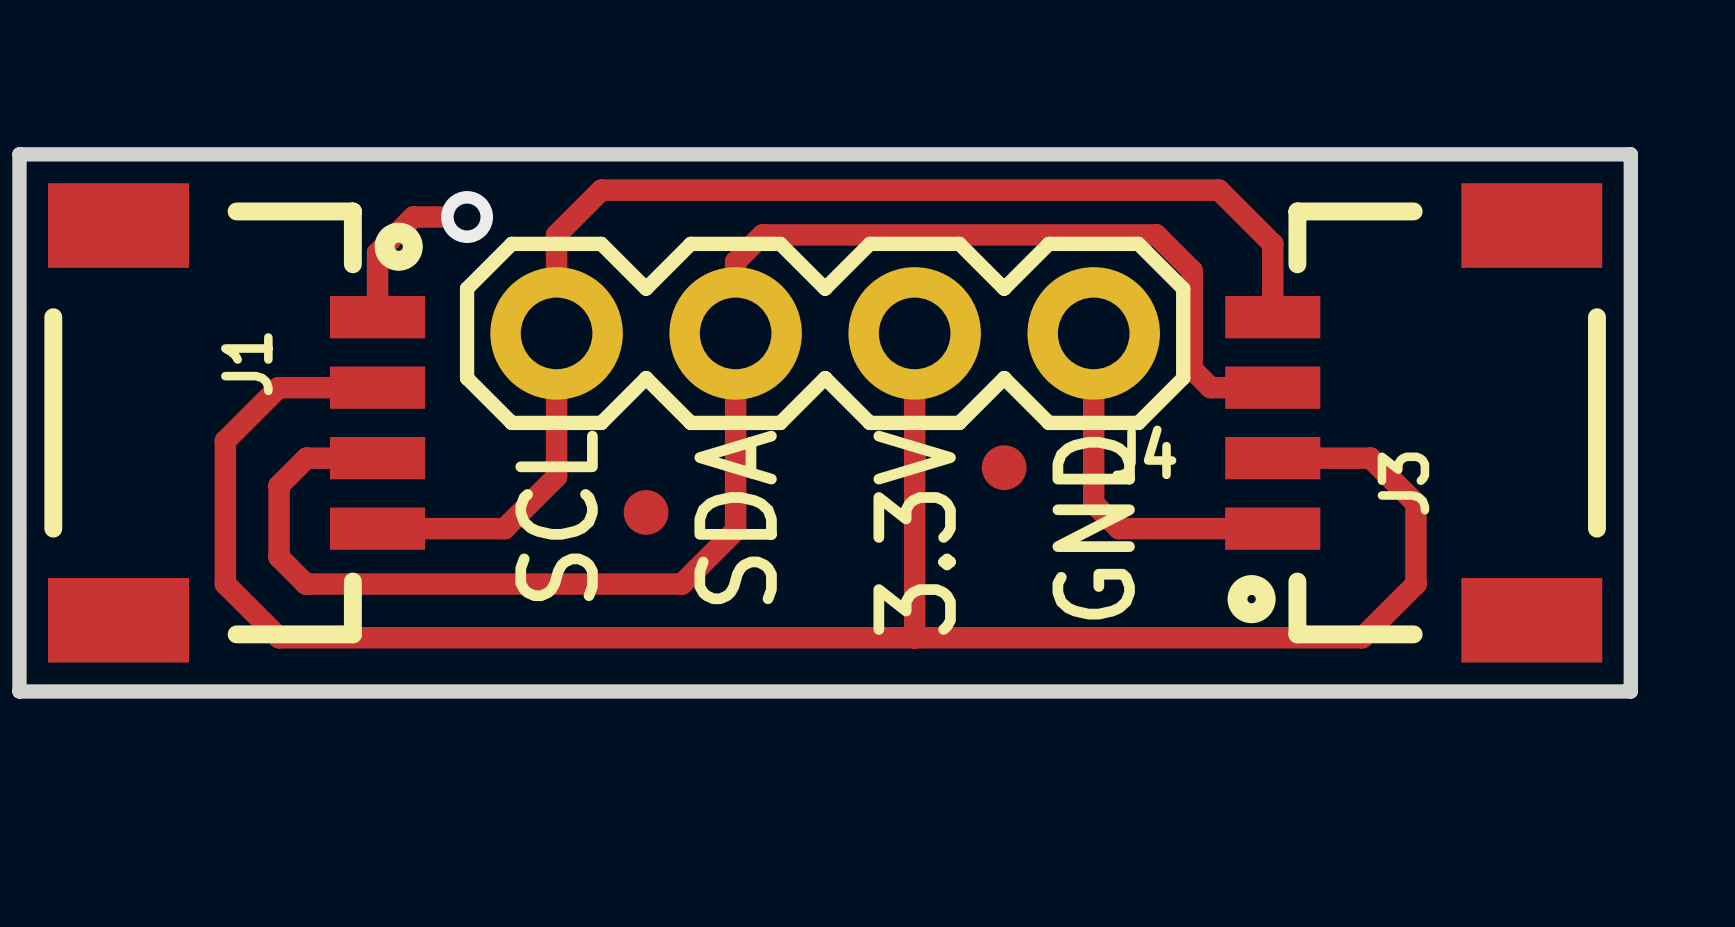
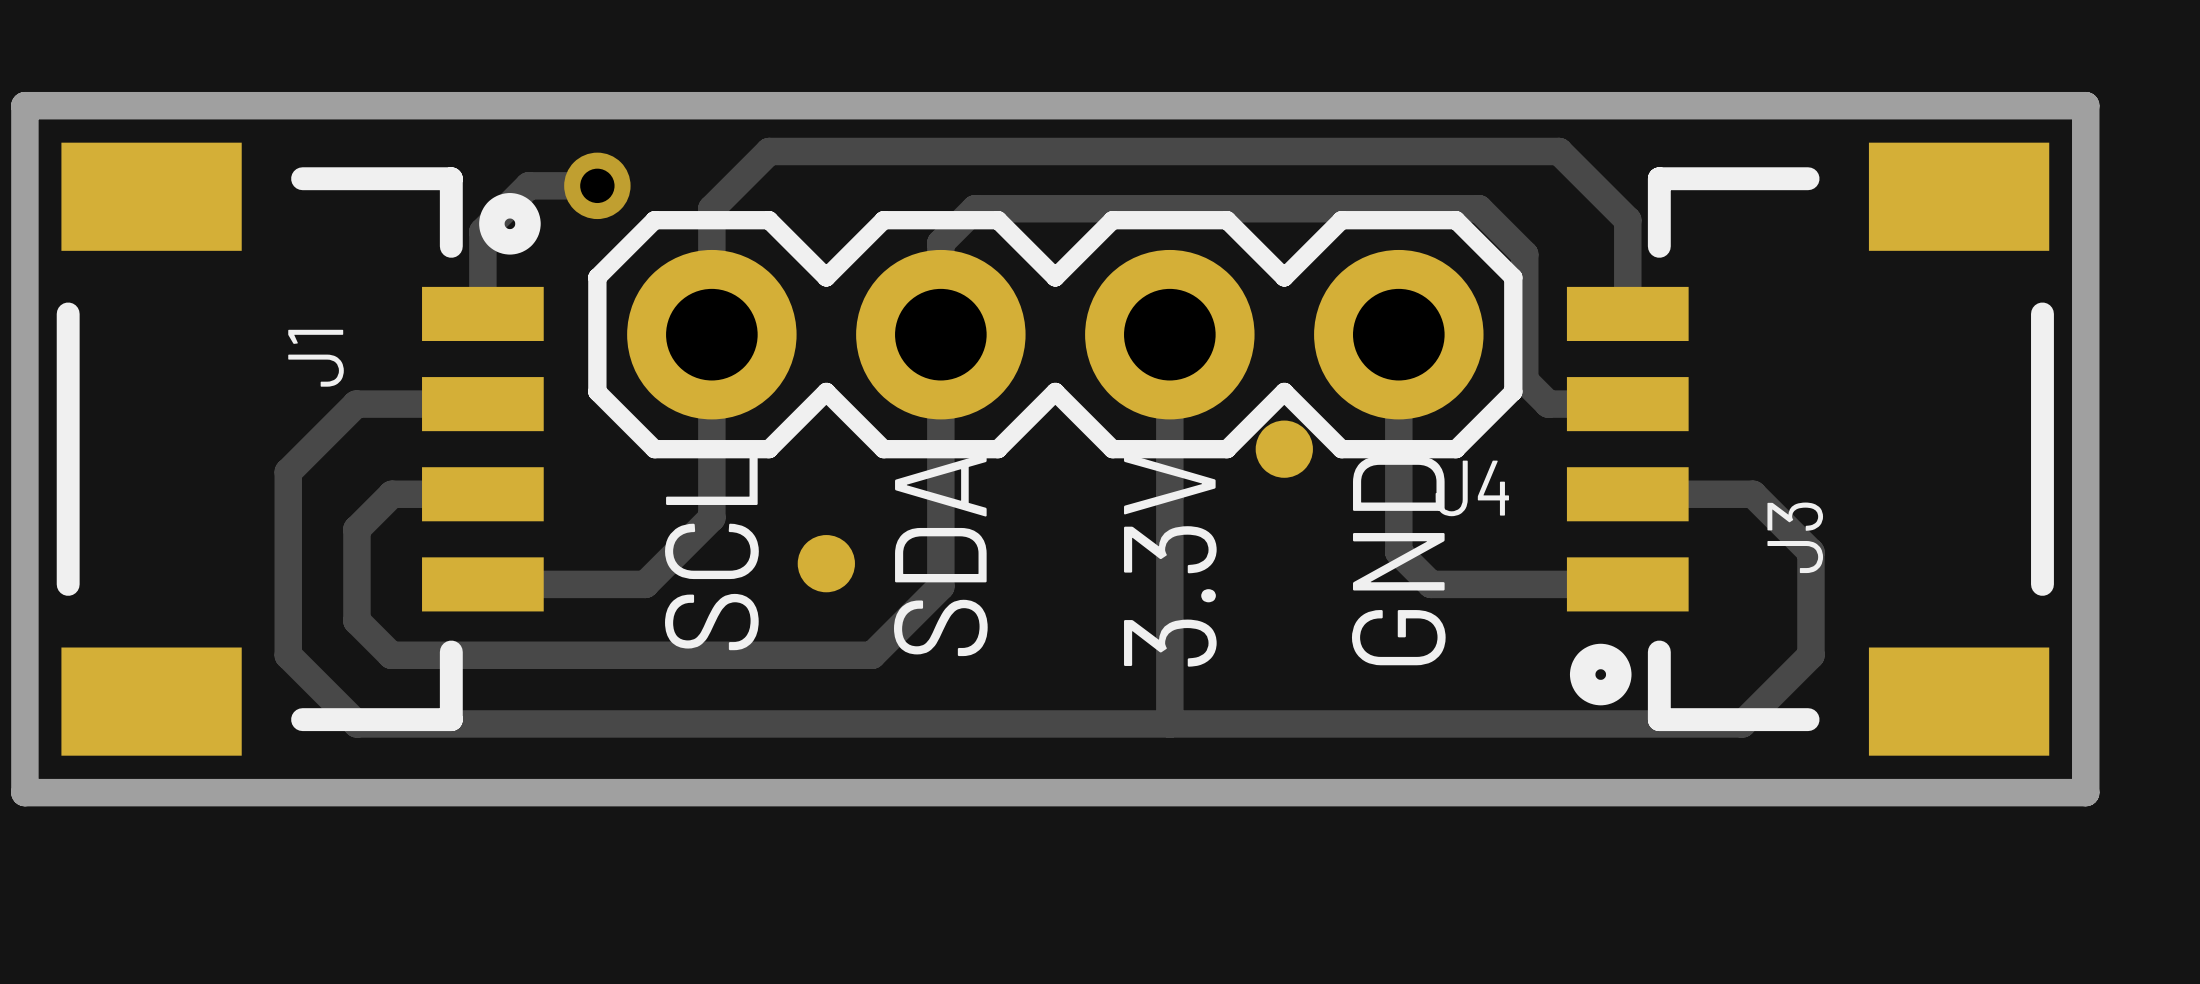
board edge width: thin (19, 154) (19, 691) (1630, 691) (1630, 154) (19, 154) -> thick (24, 105) (24, 792) (2085, 792) (2085, 105) (24, 105)
part position: (1004, 467) -> (1284, 449)

